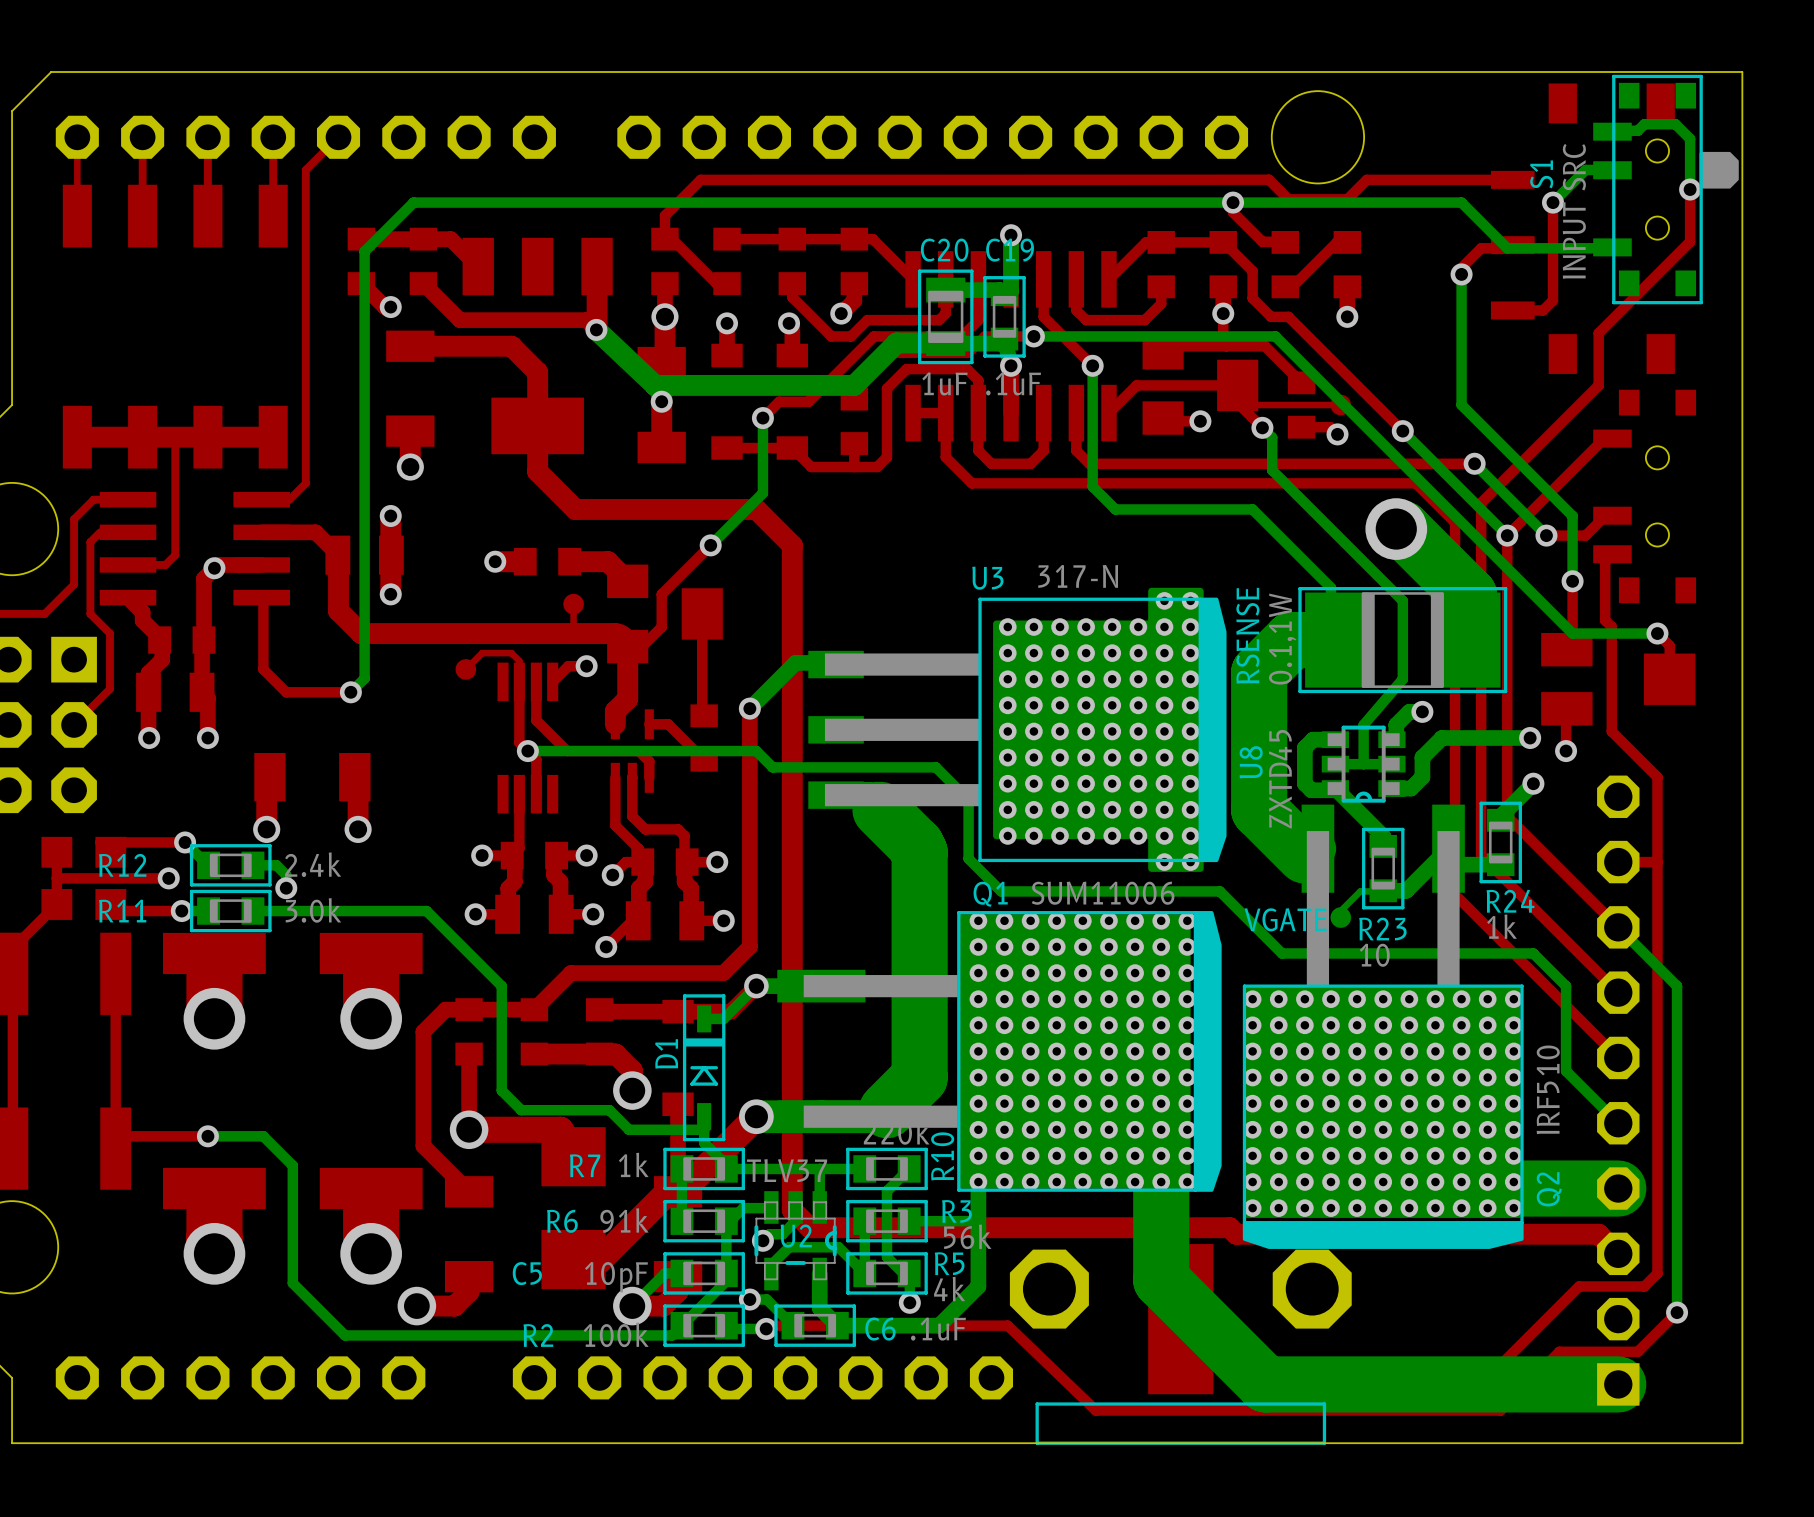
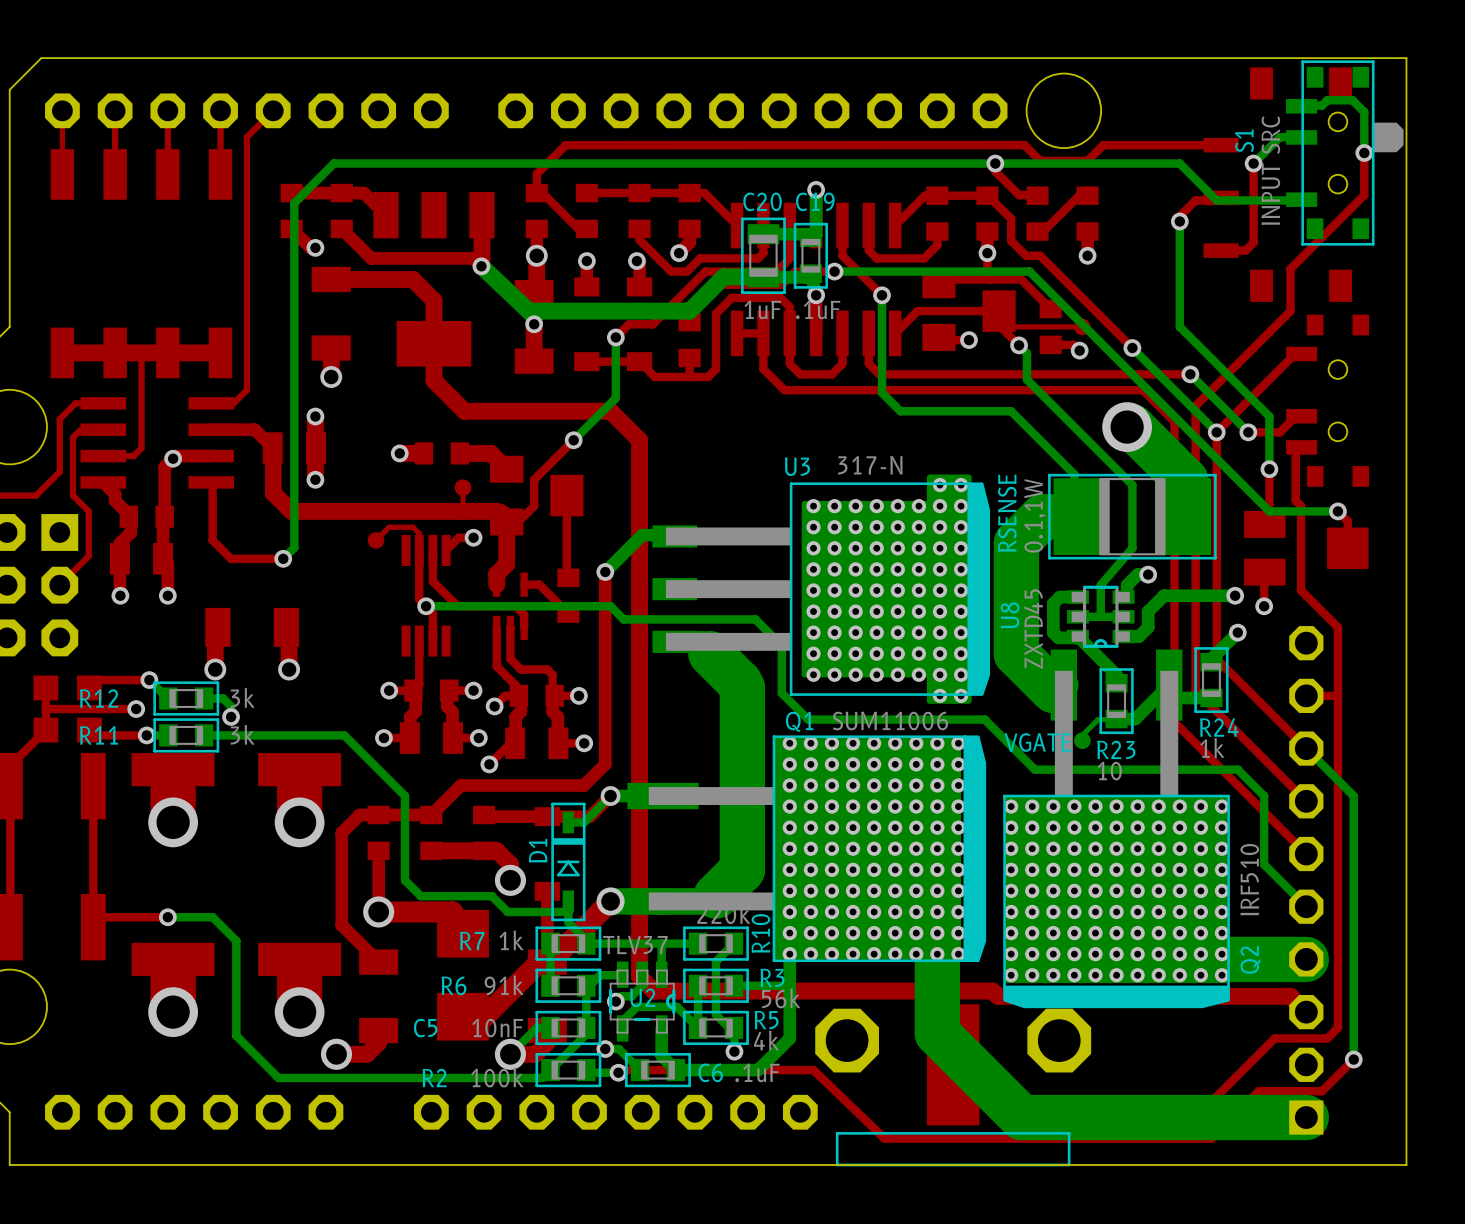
R12 value: 2.4k (313, 864) -> 3k (242, 697)
R11 value: 3.0k (313, 910) -> 3k (242, 734)
C5 value: 10pF (616, 1277) -> 10nF (497, 1028)

